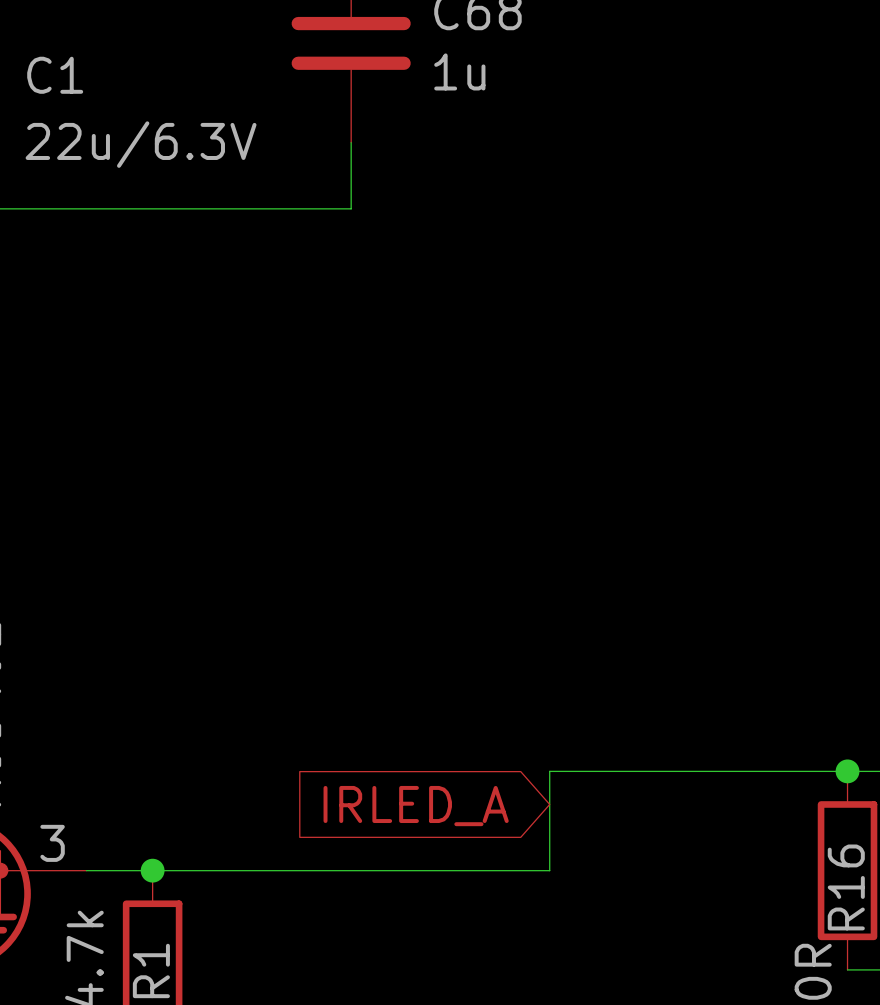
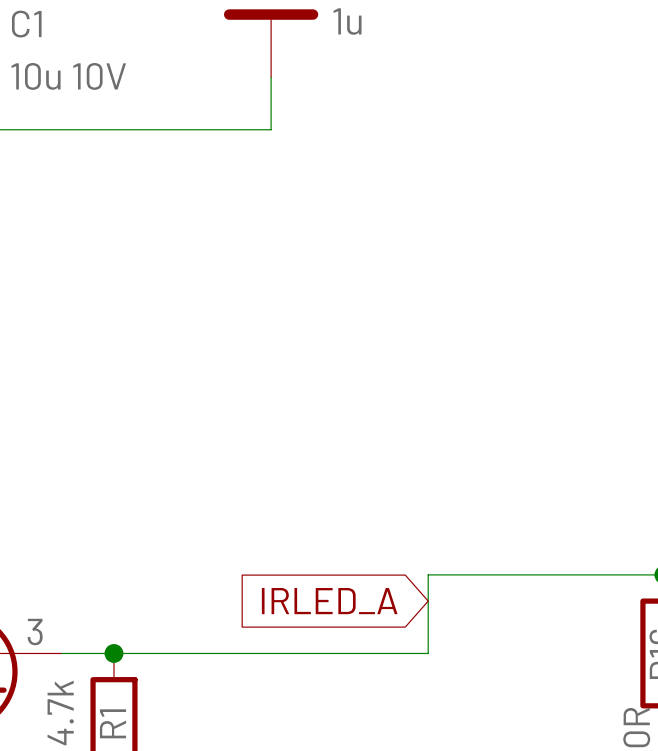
C1 value: 22u/6.3V (141, 144) -> 10u 10V (68, 76)

